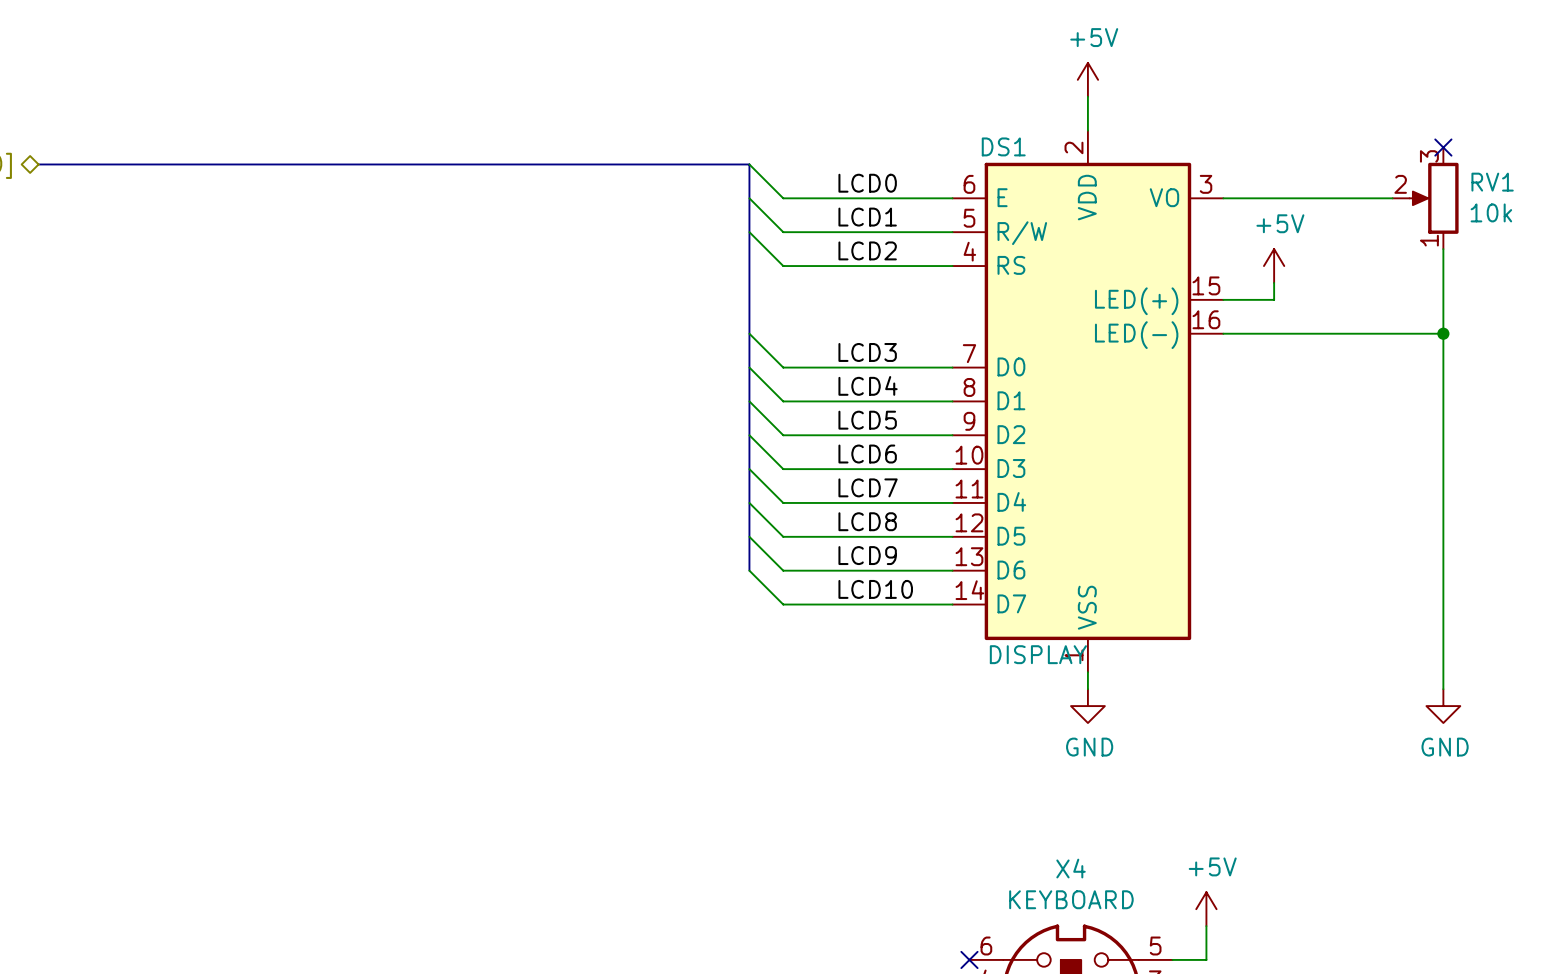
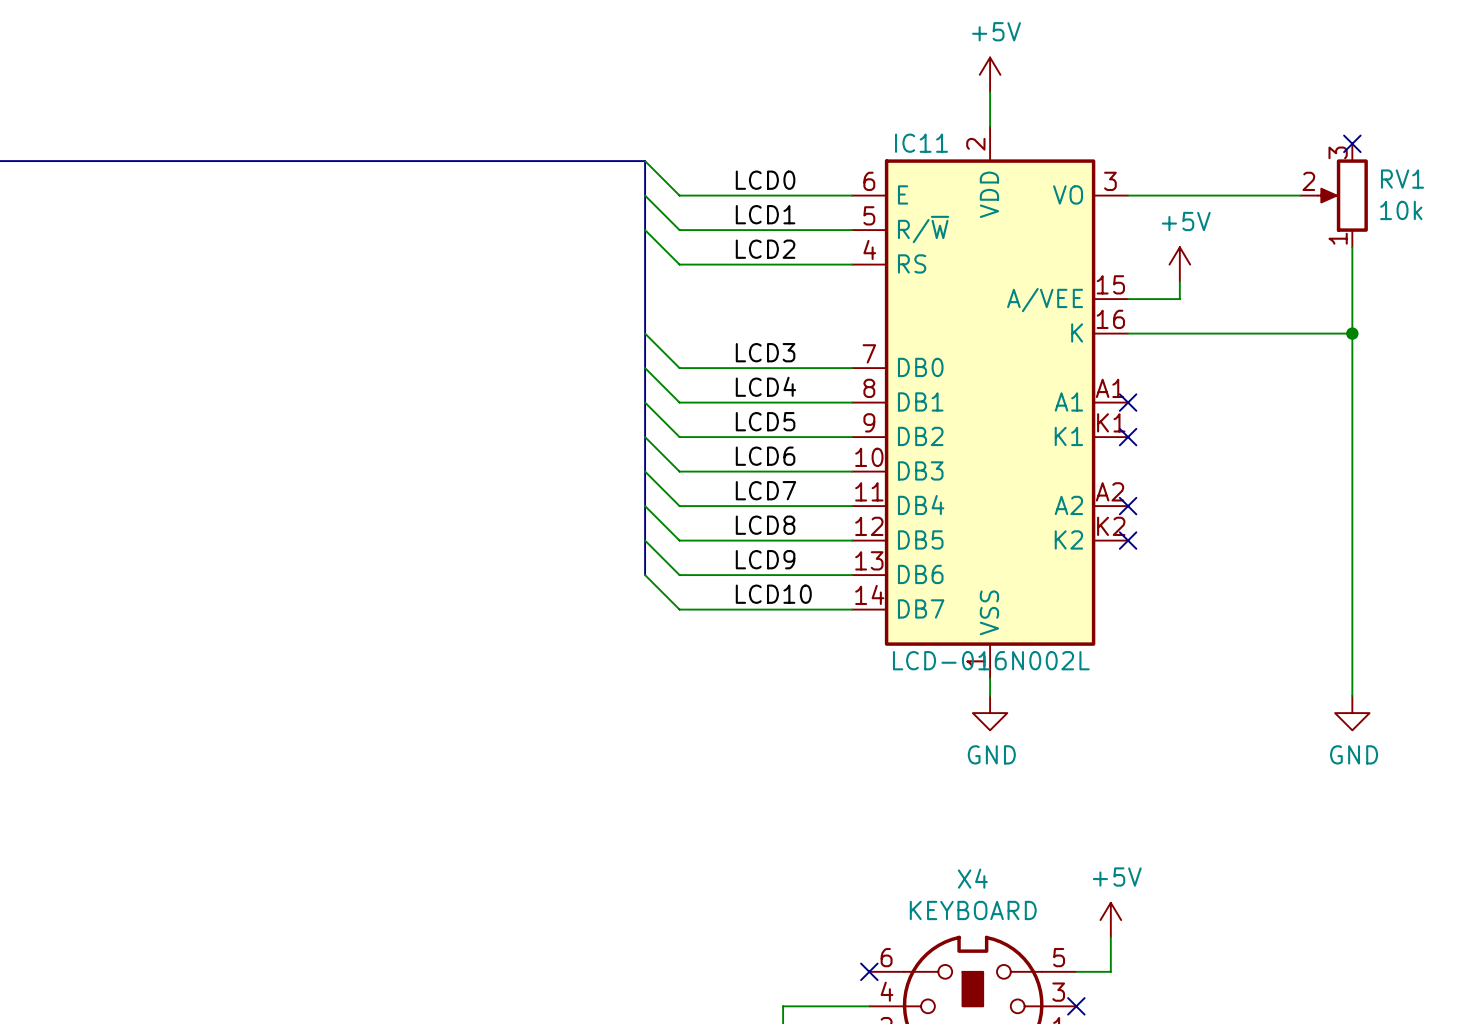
DS1: DISPLAY (1087, 401) -> none
IC11: none -> LCD-016N002L (990, 402)
no-connect mark: none -> (1128, 402)
no-connect mark: none -> (1128, 437)
no-connect mark: none -> (1128, 506)
no-connect mark: none -> (1128, 540)

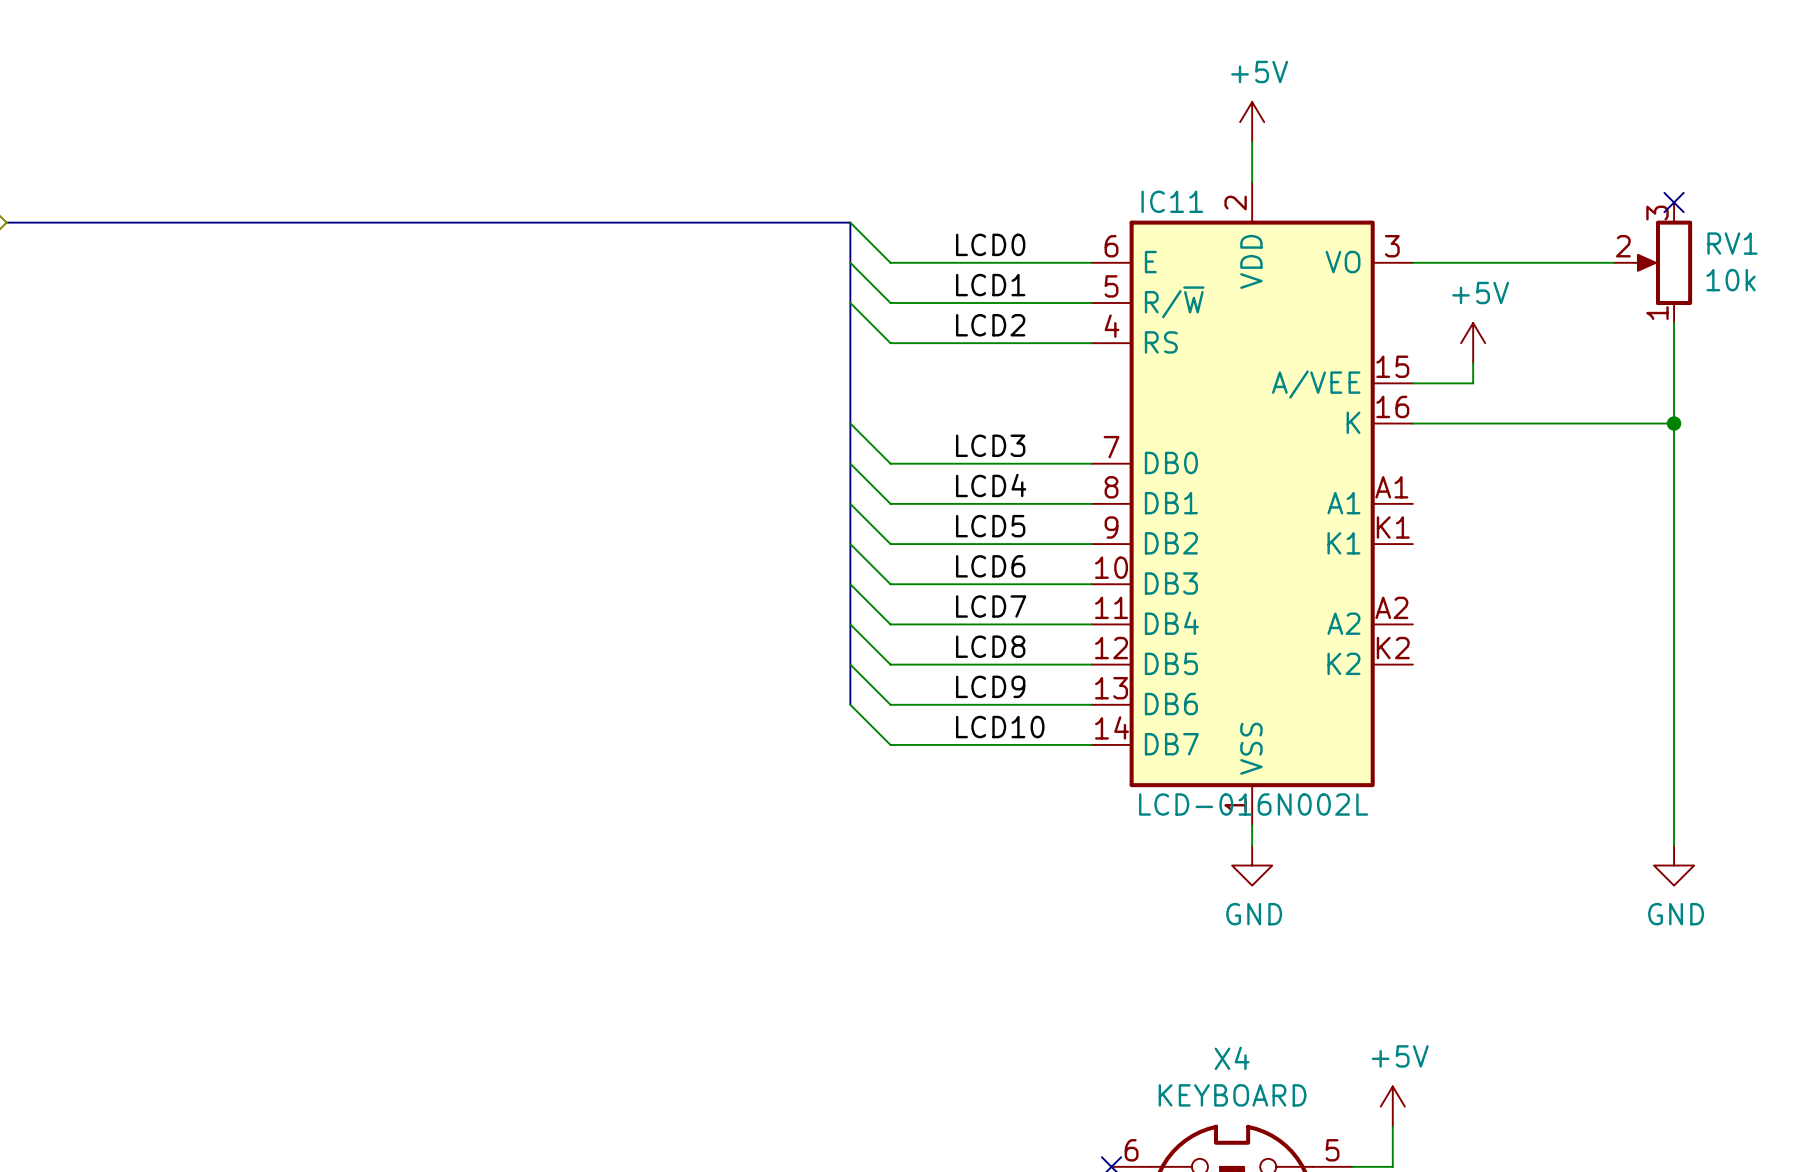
no-connect mark: (1128, 402) -> none
no-connect mark: (1128, 437) -> none
no-connect mark: (1128, 506) -> none
no-connect mark: (1128, 540) -> none

